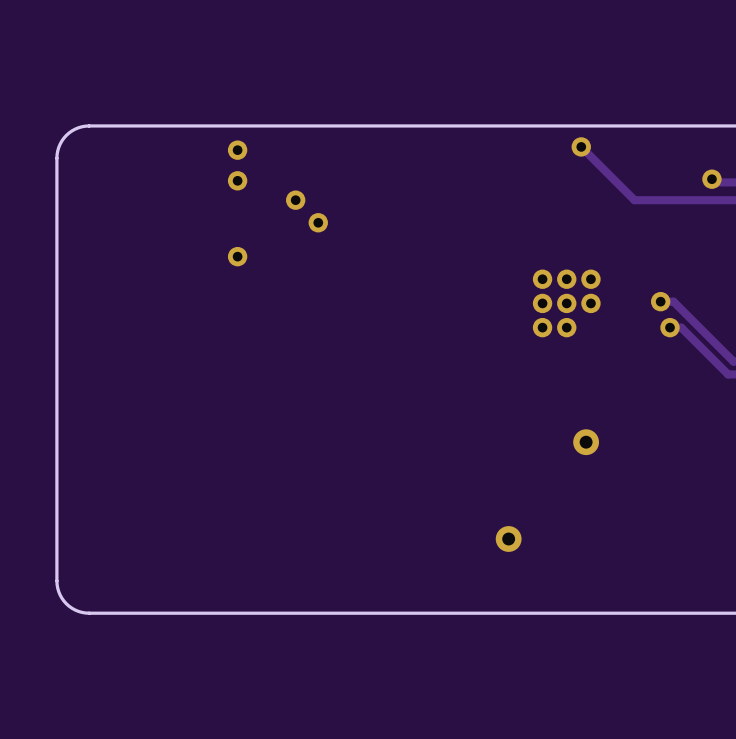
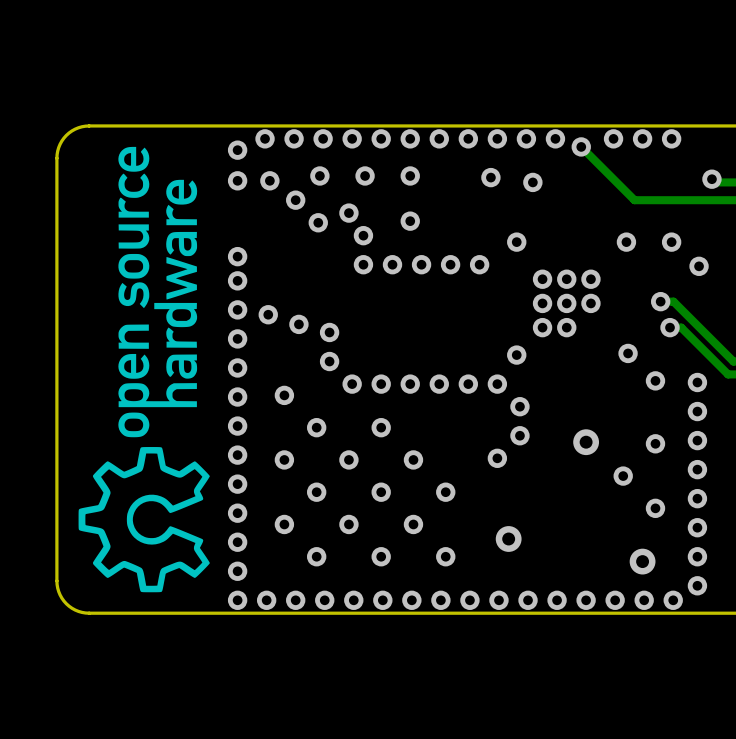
via: none -> (265, 138)
via: none -> (294, 138)
via: none -> (323, 138)
via: none -> (352, 138)
via: none -> (381, 138)
via: none -> (410, 138)
via: none -> (439, 138)
via: none -> (468, 138)
via: none -> (497, 138)
via: none -> (526, 138)
via: none -> (555, 138)
via: none -> (613, 138)
via: none -> (642, 138)
via: none -> (671, 138)
drawing: none -> [78, 146, 210, 593]
via: none -> (319, 175)
via: none -> (365, 175)
via: none -> (410, 175)
via: none -> (490, 177)
via: none -> (269, 180)
via: none -> (532, 182)
via: none -> (348, 213)
via: none -> (410, 221)
via: none -> (363, 235)
via: none -> (516, 242)
via: none -> (626, 242)
via: none -> (671, 242)
via: none -> (363, 264)
via: none -> (392, 264)
via: none -> (421, 264)
via: none -> (450, 264)
via: none -> (479, 264)
via: none -> (699, 266)
via: none -> (237, 280)
via: none -> (237, 309)
via: none -> (268, 314)
via: none -> (298, 324)
via: none -> (329, 332)
via: none -> (237, 338)
via: none -> (628, 353)
via: none -> (516, 355)
via: none -> (329, 361)
via: none -> (237, 367)
via: none -> (655, 380)
via: none -> (697, 382)
via: none -> (352, 384)
via: none -> (381, 384)
via: none -> (410, 384)
via: none -> (439, 384)
via: none -> (468, 384)
via: none -> (497, 384)
via: none -> (284, 395)
via: none -> (237, 397)
via: none -> (519, 406)
via: none -> (697, 411)
via: none -> (237, 426)
via: none -> (316, 427)
via: none -> (381, 427)
via: none -> (519, 435)
via: none -> (697, 440)
via: none -> (655, 443)
via: none -> (237, 455)
via: none -> (497, 458)
via: none -> (284, 459)
via: none -> (348, 459)
via: none -> (413, 459)
via: none -> (697, 469)
via: none -> (623, 476)
via: none -> (237, 484)
via: none -> (316, 492)
via: none -> (381, 492)
via: none -> (445, 492)
via: none -> (697, 498)
via: none -> (655, 508)
via: none -> (237, 513)
via: none -> (284, 524)
via: none -> (348, 524)
via: none -> (413, 524)
via: none -> (697, 527)
via: none -> (237, 542)
via: none -> (316, 556)
via: none -> (381, 556)
via: none -> (445, 556)
via: none -> (697, 556)
via: none -> (642, 561)
via: none -> (237, 571)
via: none -> (697, 585)
via: none -> (237, 600)
via: none -> (266, 600)
via: none -> (295, 600)
via: none -> (324, 600)
via: none -> (353, 600)
via: none -> (382, 600)
via: none -> (411, 600)
via: none -> (440, 600)
via: none -> (469, 600)
via: none -> (498, 600)
via: none -> (528, 600)
via: none -> (557, 600)
via: none -> (586, 600)
via: none -> (615, 600)
via: none -> (644, 600)
via: none -> (673, 600)

